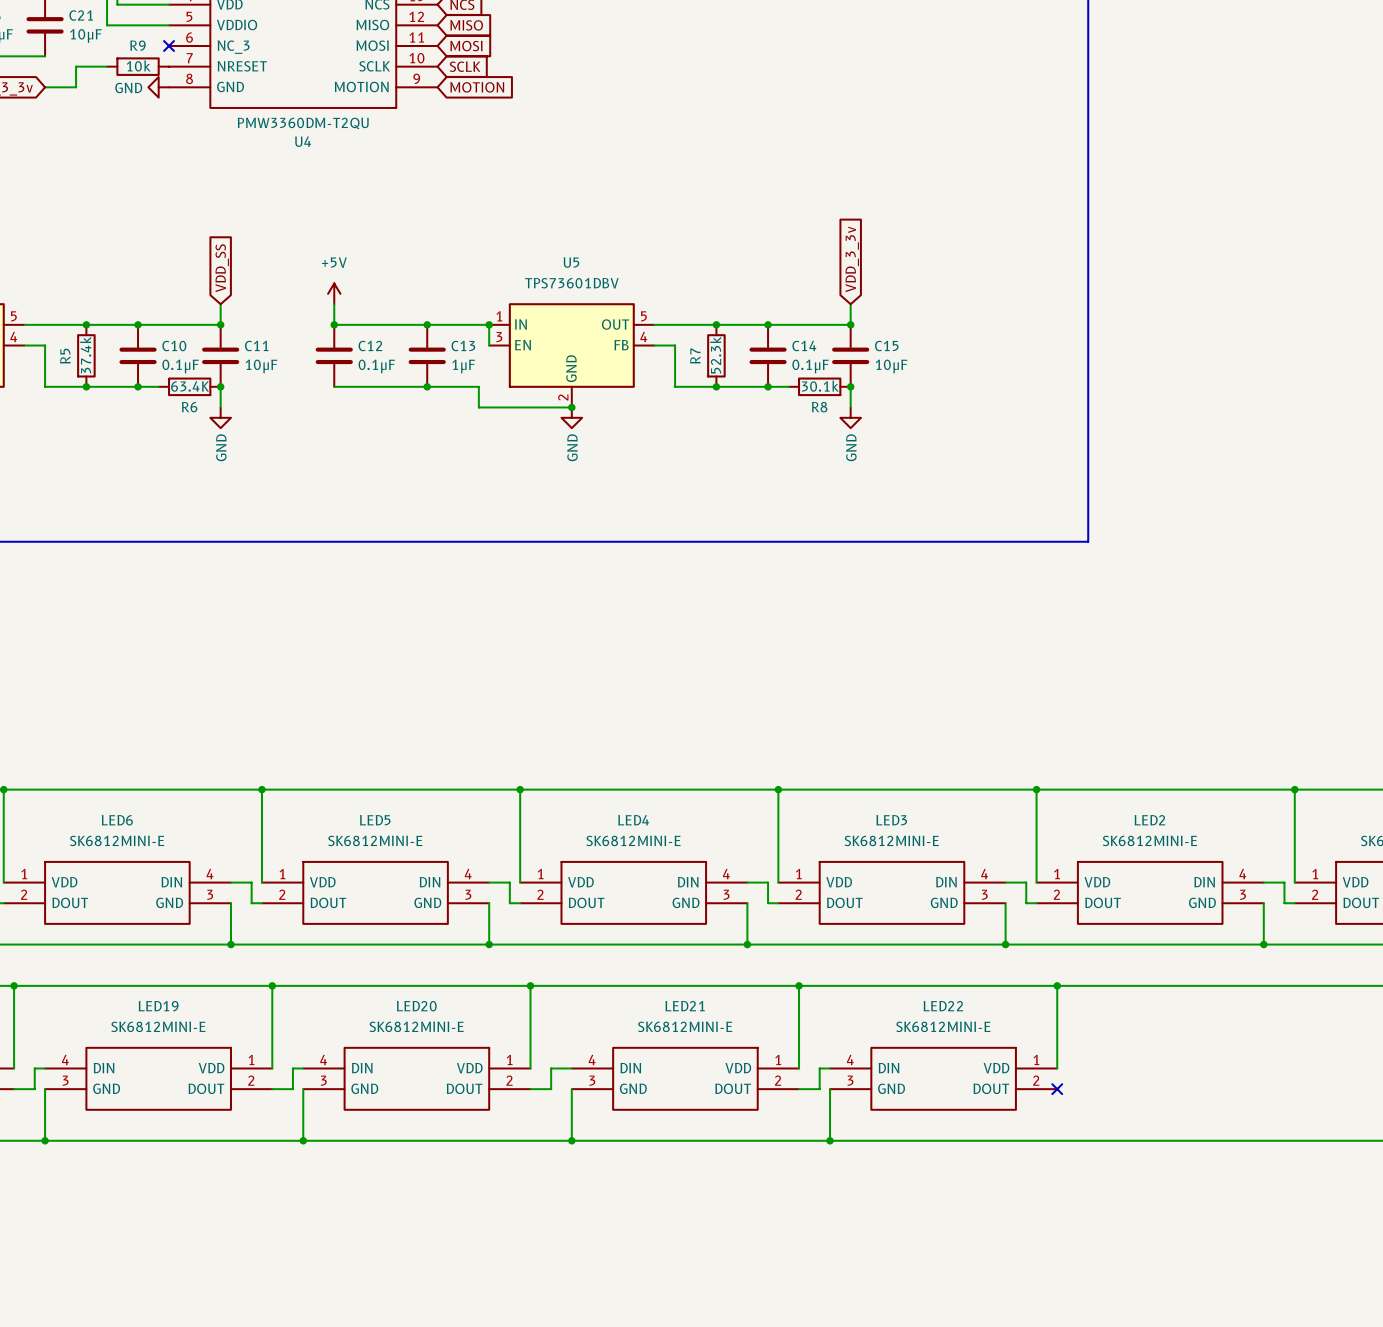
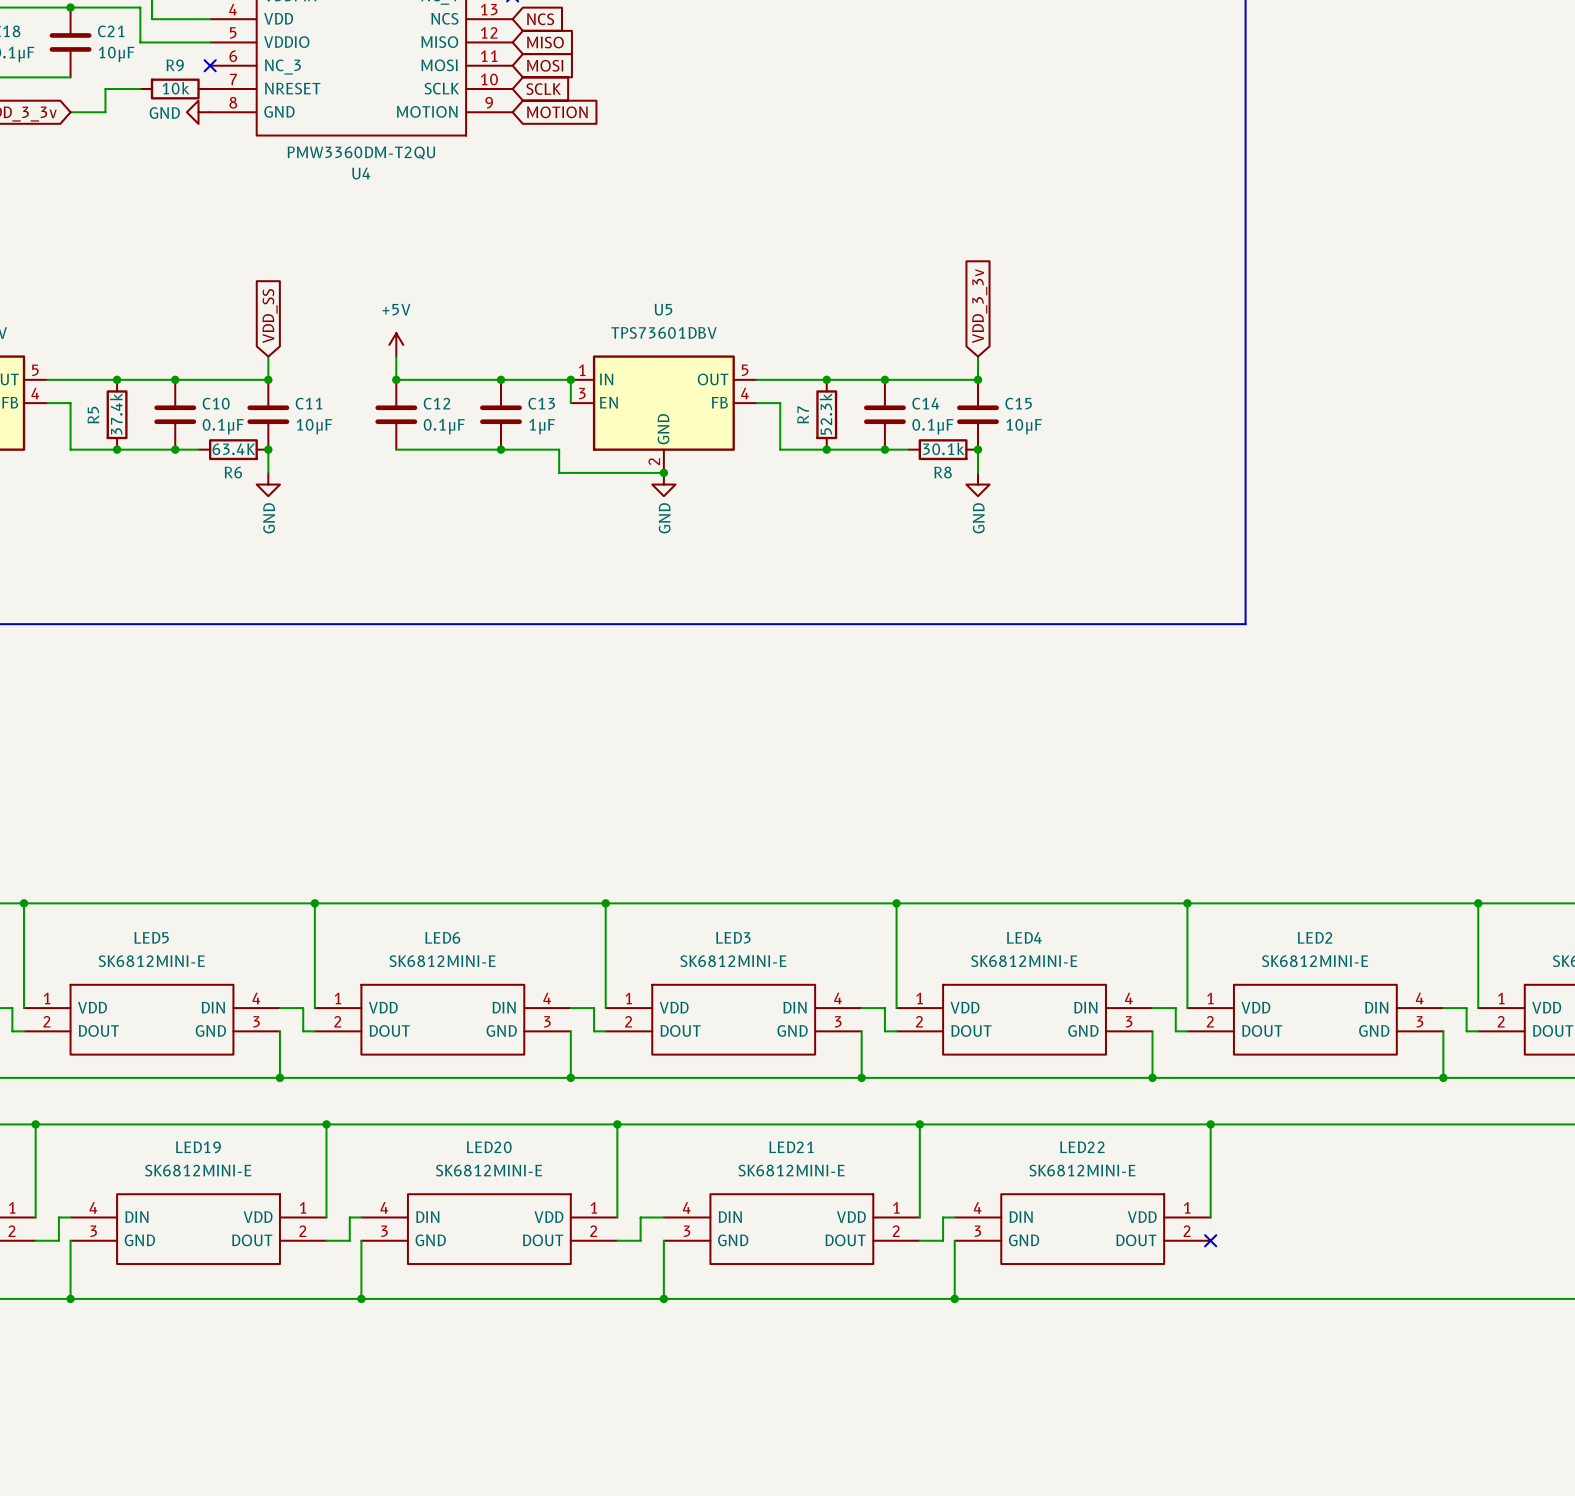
LED6 name: LED6 (117, 820) -> LED5 (151, 937)
LED5 name: LED5 (375, 820) -> LED6 (442, 937)
LED4 name: LED4 (633, 820) -> LED3 (733, 937)
LED3 name: LED3 (891, 820) -> LED4 (1024, 937)

